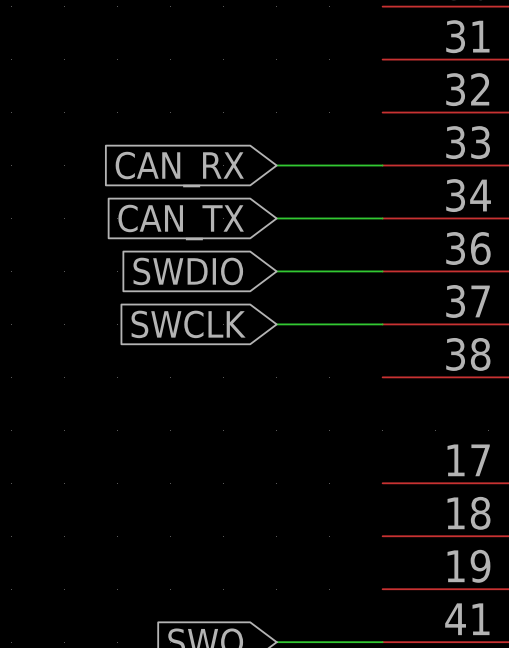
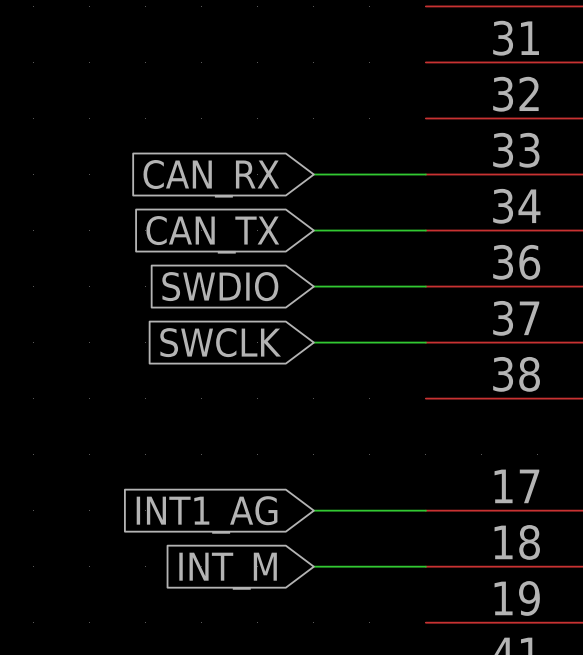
wire: none -> (313, 510) (425, 510)
global label: none -> INT1_AG (207, 514)
wire: none -> (313, 566) (425, 566)
global label: none -> INT_M (228, 571)

